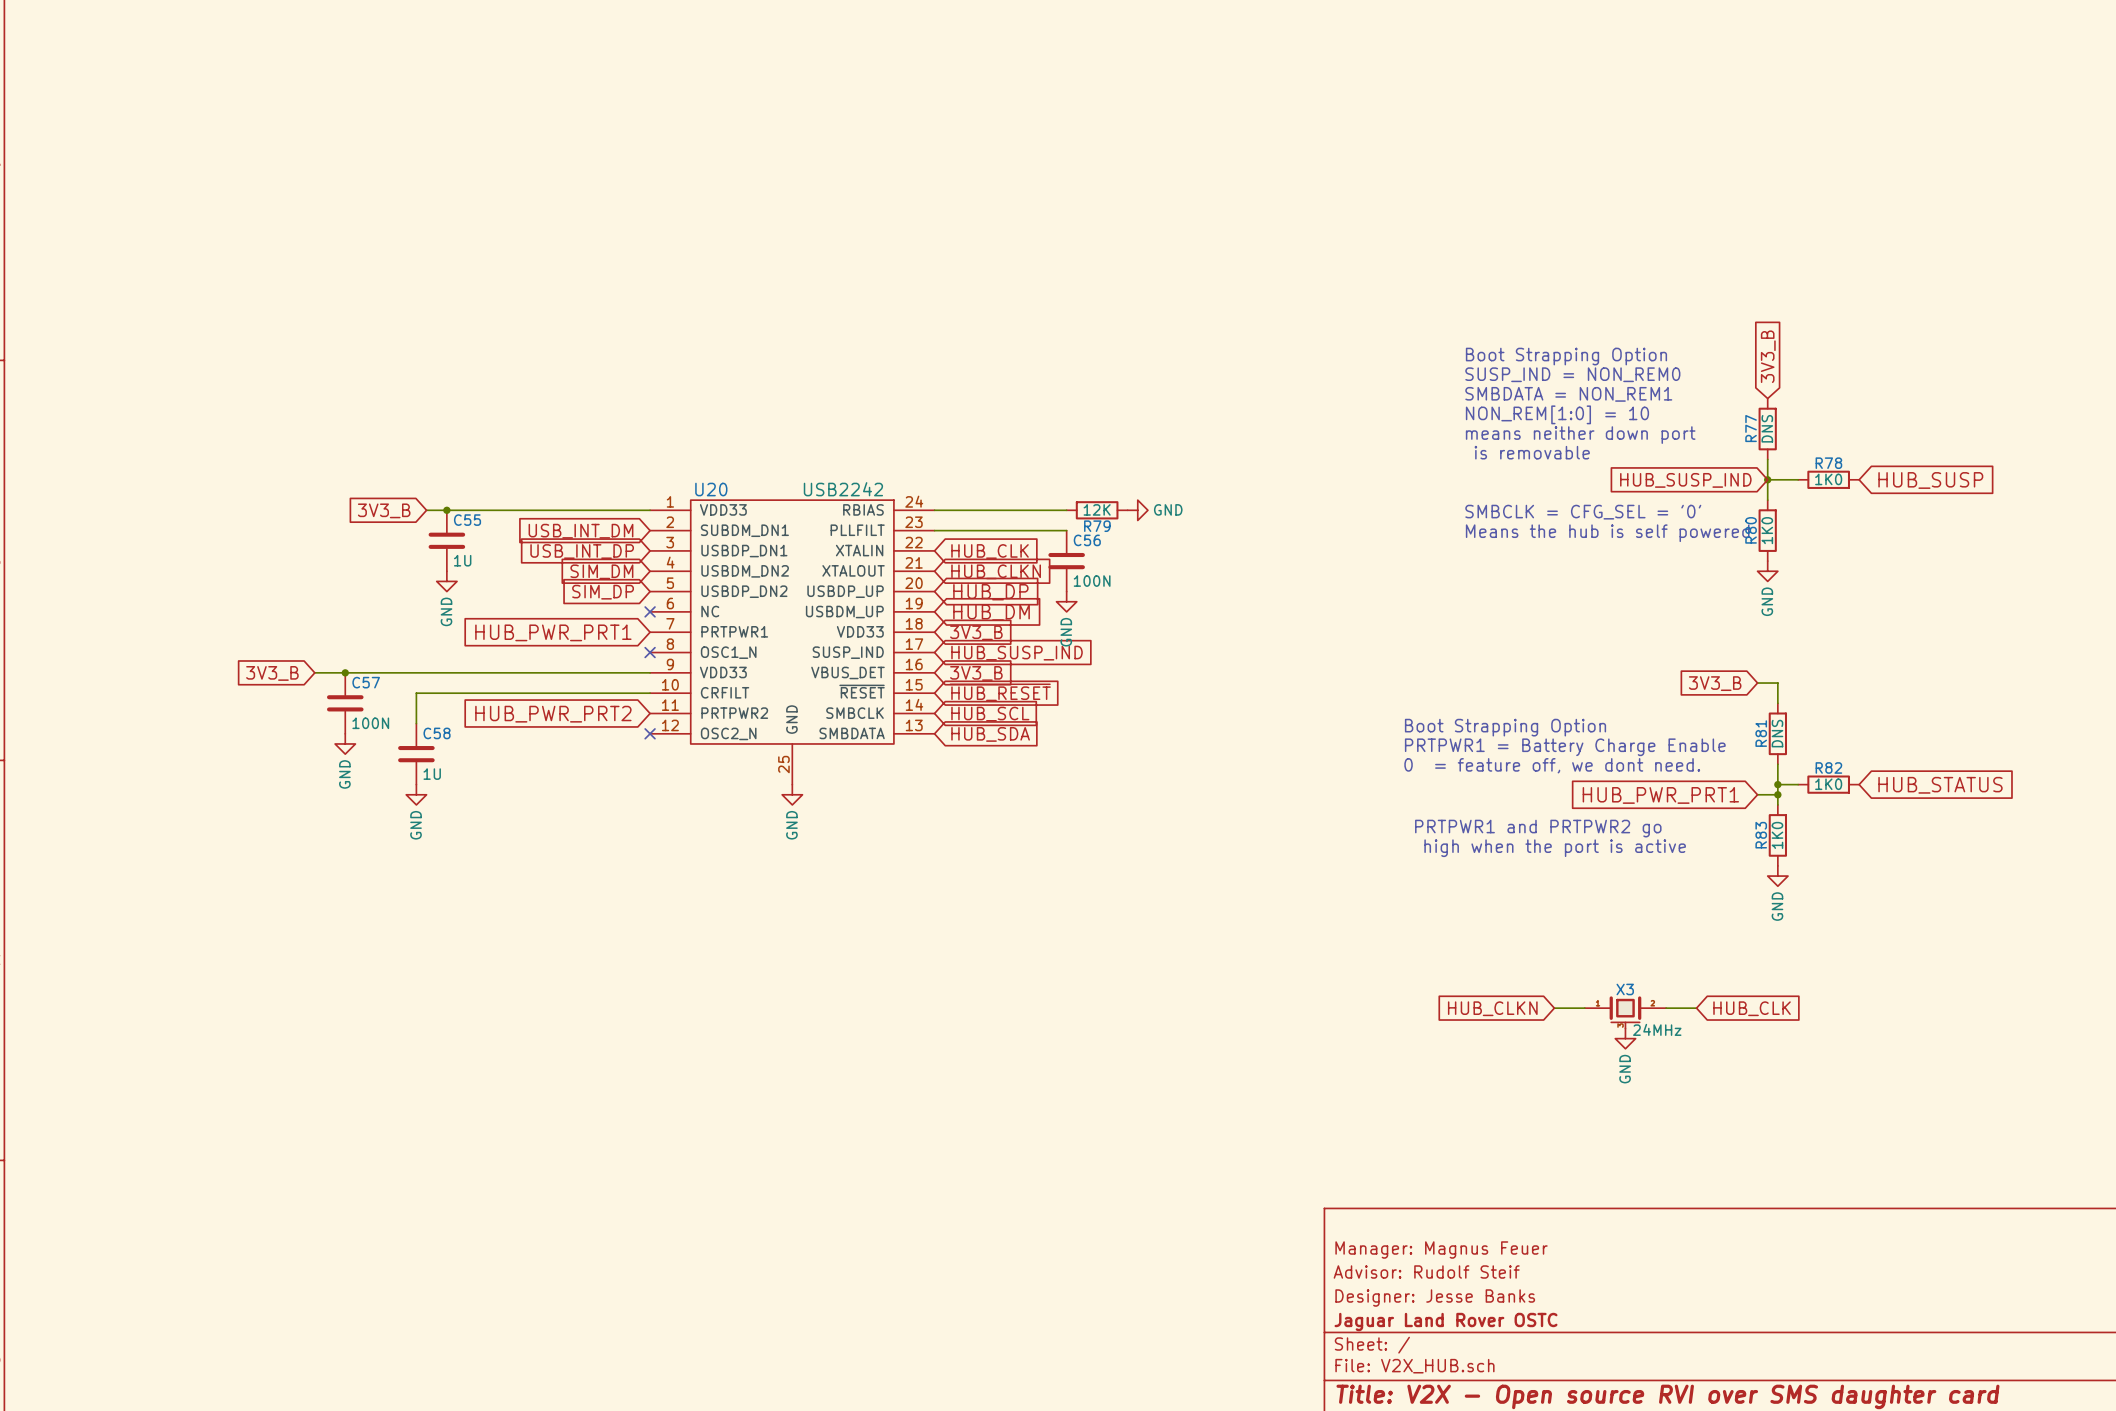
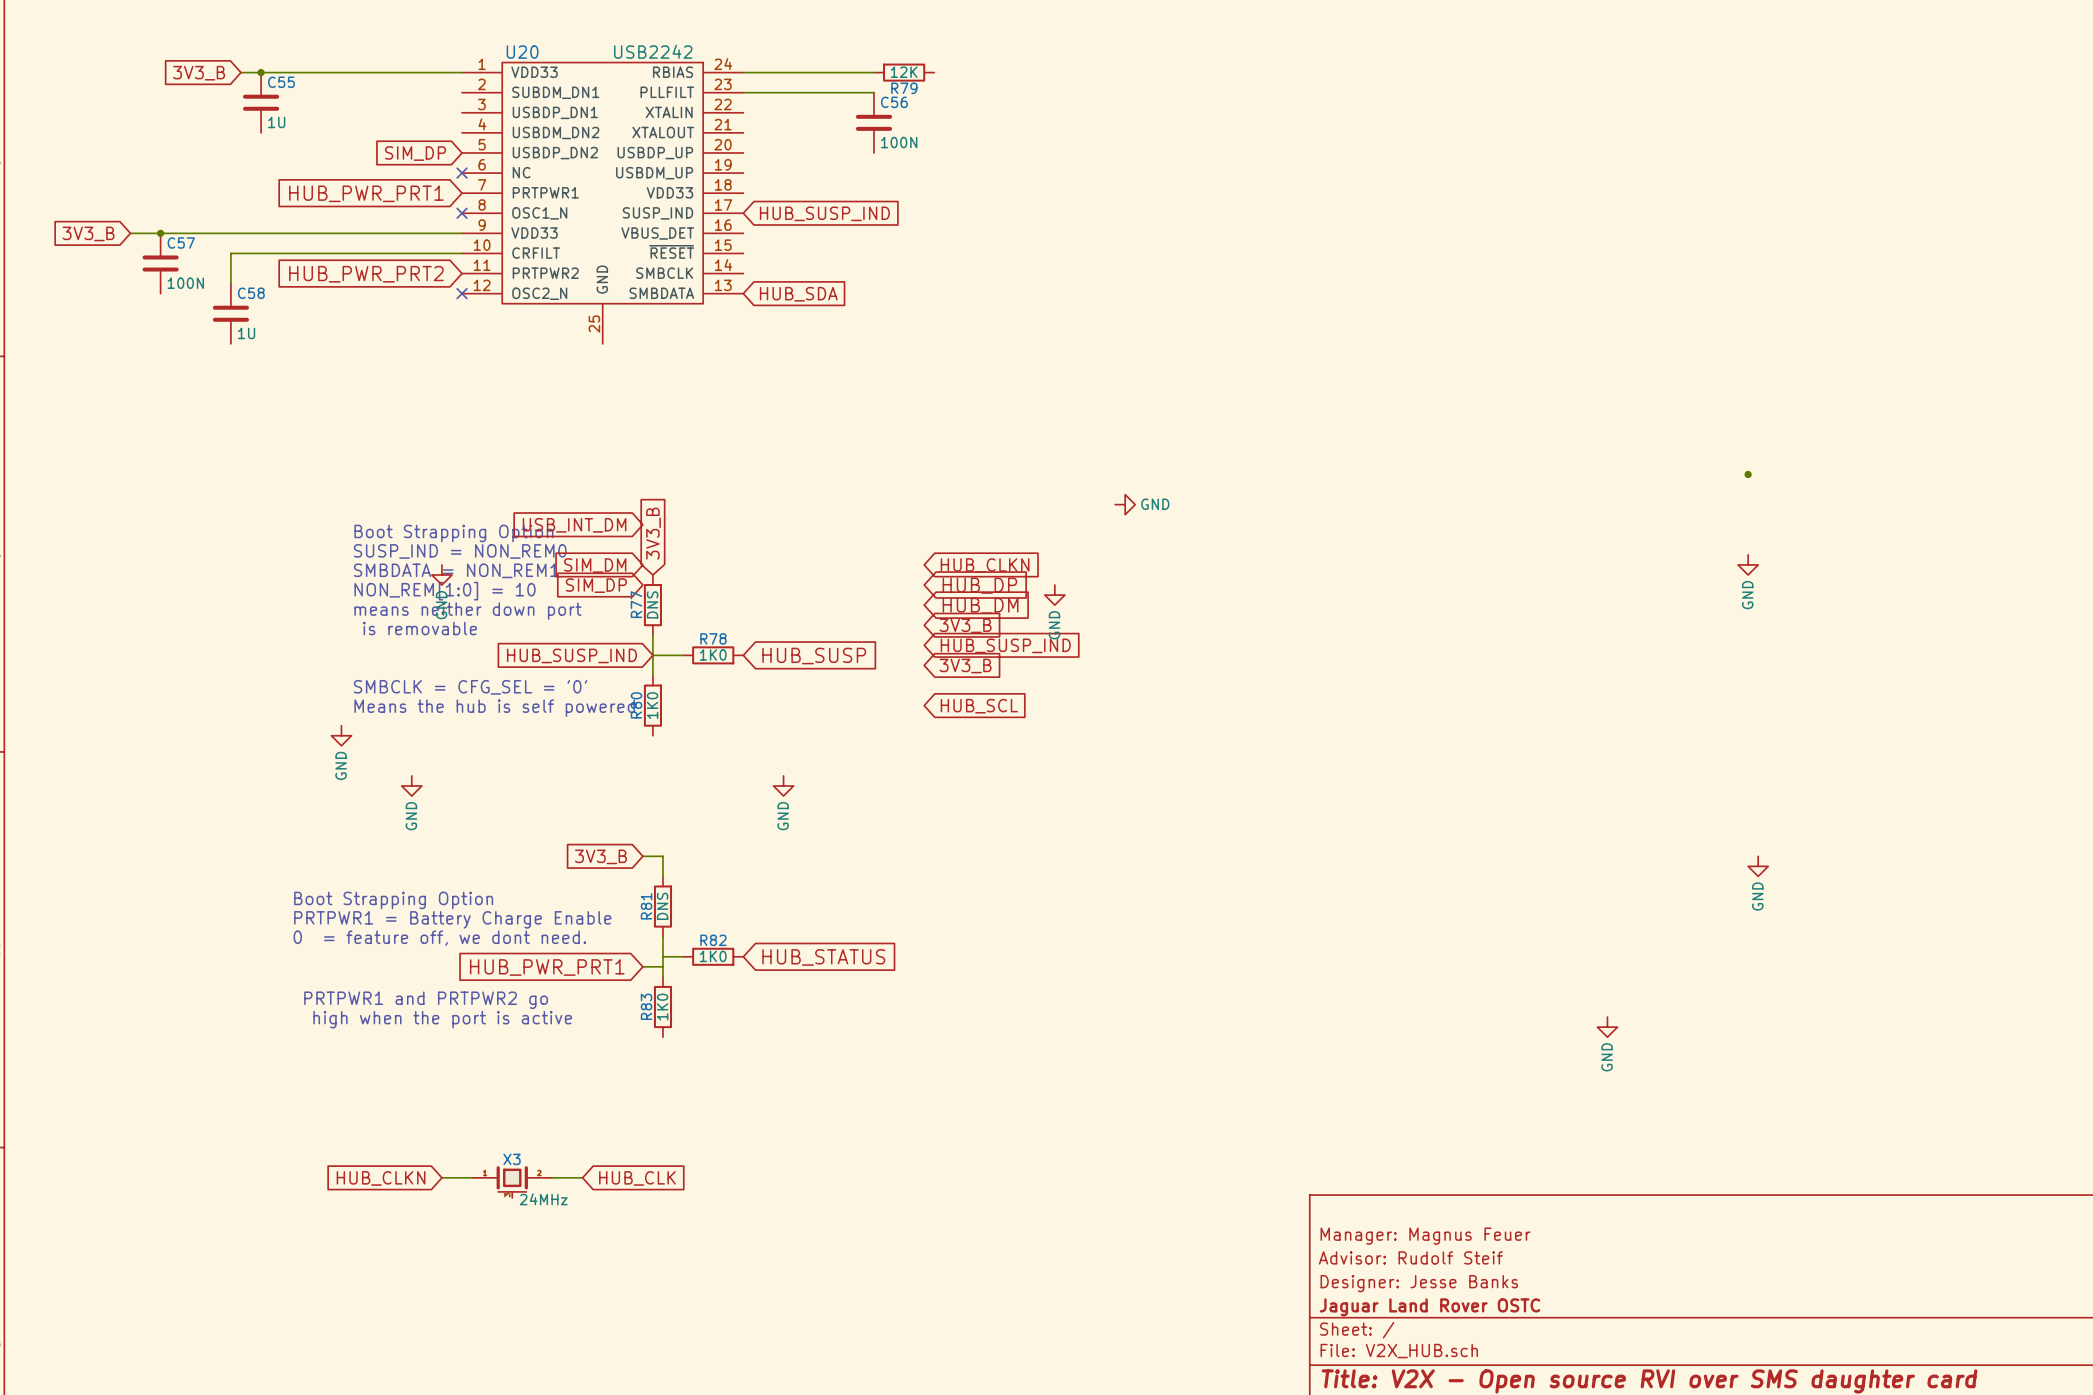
global label: none -> 3V3_B (199, 73)
wire: none -> (240, 72) (462, 72)
junction: none -> (261, 72)
wire: none -> (743, 72) (873, 72)
wire: none -> (743, 92) (873, 92)
global label: none -> SIM_DP (415, 153)
no-connect mark: none -> (462, 173)
global label: none -> HUB_PWR_PRT1 (366, 193)
no-connect mark: none -> (462, 213)
global label: none -> HUB_SUSP_IND (824, 213)
wire: none -> (130, 233) (462, 233)
junction: none -> (160, 233)
global label: none -> 3V3_B (88, 233)
wire: none -> (462, 253) (230, 253) (230, 283)
global label: none -> HUB_PWR_PRT2 (366, 274)
no-connect mark: none -> (462, 293)
global label: none -> HUB_SDA (798, 294)
text: Boot Strapping Option (1566, 356) -> none
global label: 3V3_B (1768, 356) -> none
text: SUSP_IND = NON_REM0 (1572, 374) -> none
text: SMBDATA = NON_REM1 (1568, 394) -> none
text: NON_REM[1:0] = 10 (1557, 414) -> none
R77 position: (1767, 429) -> (652, 605)
text: means neither down port (1580, 435) -> none
text: is removable (1532, 452) -> none
wire: (1767, 459) (1767, 500) -> none
wire: (1767, 479) (1798, 479) -> none
R78 position: (1828, 479) -> (713, 655)
global label: HUB_SUSP_IND (1685, 480) -> none
global label: HUB_SUSP (1930, 480) -> none
global label: 3V3_B (384, 510) -> none
wire: (426, 510) (650, 510) -> none
junction: (446, 510) -> none
wire: (934, 510) (1066, 510) -> none
R79 position: (1097, 510) -> (904, 72)
text: SMBCLK = CFG_SEL = '0' (1583, 512) -> none
wire: (934, 530) (1066, 530) -> none
R80 position: (1767, 530) -> (652, 705)
text: Means the hub is self powered (1607, 533) -> none
text: none -> Boot Strapping Option (453, 533)
global label: none -> 3V3_B (653, 533)
C55 position: (446, 540) -> (261, 102)
global label: USB_INT_DP (582, 551) -> none
global label: HUB_CLK (990, 551) -> none
text: none -> SUSP_IND = NON_REM0 (460, 551)
C56 position: (1066, 561) -> (873, 122)
text: none -> SMBDATA = NON_REM1 (456, 570)
text: none -> NON_REM[1:0] = 10 (445, 591)
no-connect mark: (650, 611) -> none
text: none -> means neither down port (467, 611)
global label: HUB_PWR_PRT1 (553, 632) -> none
text: none -> is removable (420, 628)
wire: none -> (652, 635) (652, 675)
U20 position: (792, 642) -> (602, 203)
no-connect mark: (650, 652) -> none
wire: none -> (652, 655) (683, 655)
global label: none -> HUB_SUSP_IND (571, 655)
global label: none -> HUB_SUSP (814, 656)
wire: (314, 672) (650, 672) -> none
junction: (345, 672) -> none
global label: 3V3_B (272, 673) -> none
global label: 3V3_B (1715, 683) -> none
wire: (1757, 683) (1777, 683) (1777, 703) -> none
global label: ~{HUB_RESET} (1000, 692) -> none
wire: (650, 693) (416, 693) (416, 723) -> none
text: none -> SMBCLK = CFG_SEL = '0' (470, 687)
C57 position: (345, 703) -> (160, 263)
global label: HUB_PWR_PRT2 (553, 714) -> none
text: none -> Means the hub is self powered (494, 708)
text: Boot Strapping Option (1505, 727) -> none
no-connect mark: (650, 733) -> none
R81 position: (1777, 733) -> (662, 906)
global label: HUB_SDA (990, 734) -> none
text: PRTPWR1 = Battery Charge Enable (1565, 747) -> none
C58 position: (416, 754) -> (230, 313)
wire: (1777, 764) (1777, 804) -> none
text: 0 = feature off, we dont need. (1552, 765) -> none
wire: (1777, 784) (1798, 784) -> none
junction: (1777, 784) -> none
R82 position: (1828, 784) -> (713, 956)
global label: HUB_STATUS (1940, 785) -> none
wire: (1757, 794) (1777, 794) -> none
junction: (1777, 794) -> none
global label: HUB_PWR_PRT1 (1660, 795) -> none
text: PRTPWR1 and PRTPWR2 go (1538, 828) -> none
R83 position: (1777, 835) -> (662, 1007)
text: high when the port is active (1555, 848) -> none
wire: none -> (642, 856) (662, 856) (662, 876)
global label: none -> 3V3_B (600, 856)
text: none -> Boot Strapping Option (393, 900)
text: none -> PRTPWR1 = Battery Charge Enable (452, 919)
wire: none -> (662, 936) (662, 976)
text: none -> 0 = feature off, we dont need. (439, 938)
wire: none -> (662, 956) (683, 956)
global label: none -> HUB_STATUS (823, 957)
wire: none -> (642, 966) (662, 966)
global label: none -> HUB_PWR_PRT1 (547, 967)
global label: HUB_CLKN (1492, 1008) -> none
wire: (1554, 1008) (1584, 1008) -> none
wire: (1666, 1008) (1696, 1008) -> none
global label: HUB_CLK (1752, 1008) -> none
text: none -> PRTPWR1 and PRTPWR2 go (426, 1000)
X3 position: (1625, 1012) -> (512, 1182)
text: none -> high when the port is active (442, 1019)
global label: none -> HUB_CLKN (381, 1178)
wire: none -> (441, 1177) (472, 1177)
wire: none -> (552, 1177) (582, 1177)
global label: none -> HUB_CLK (637, 1178)

